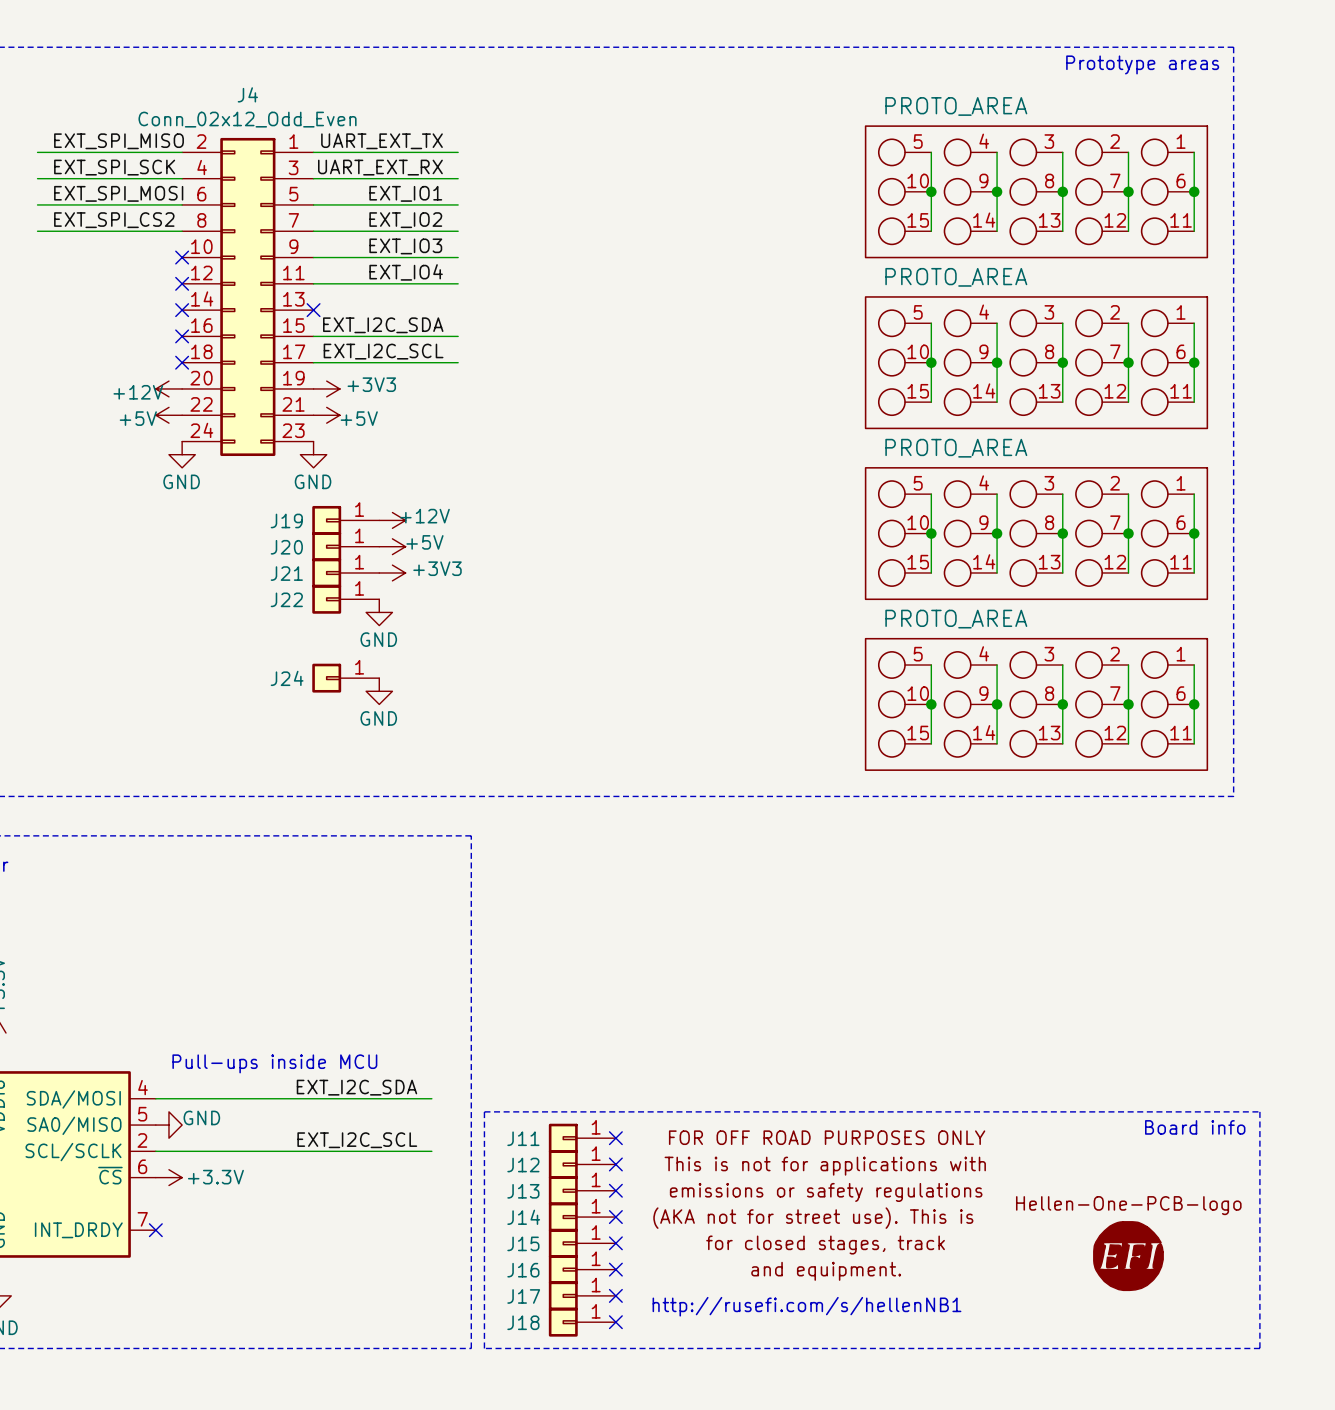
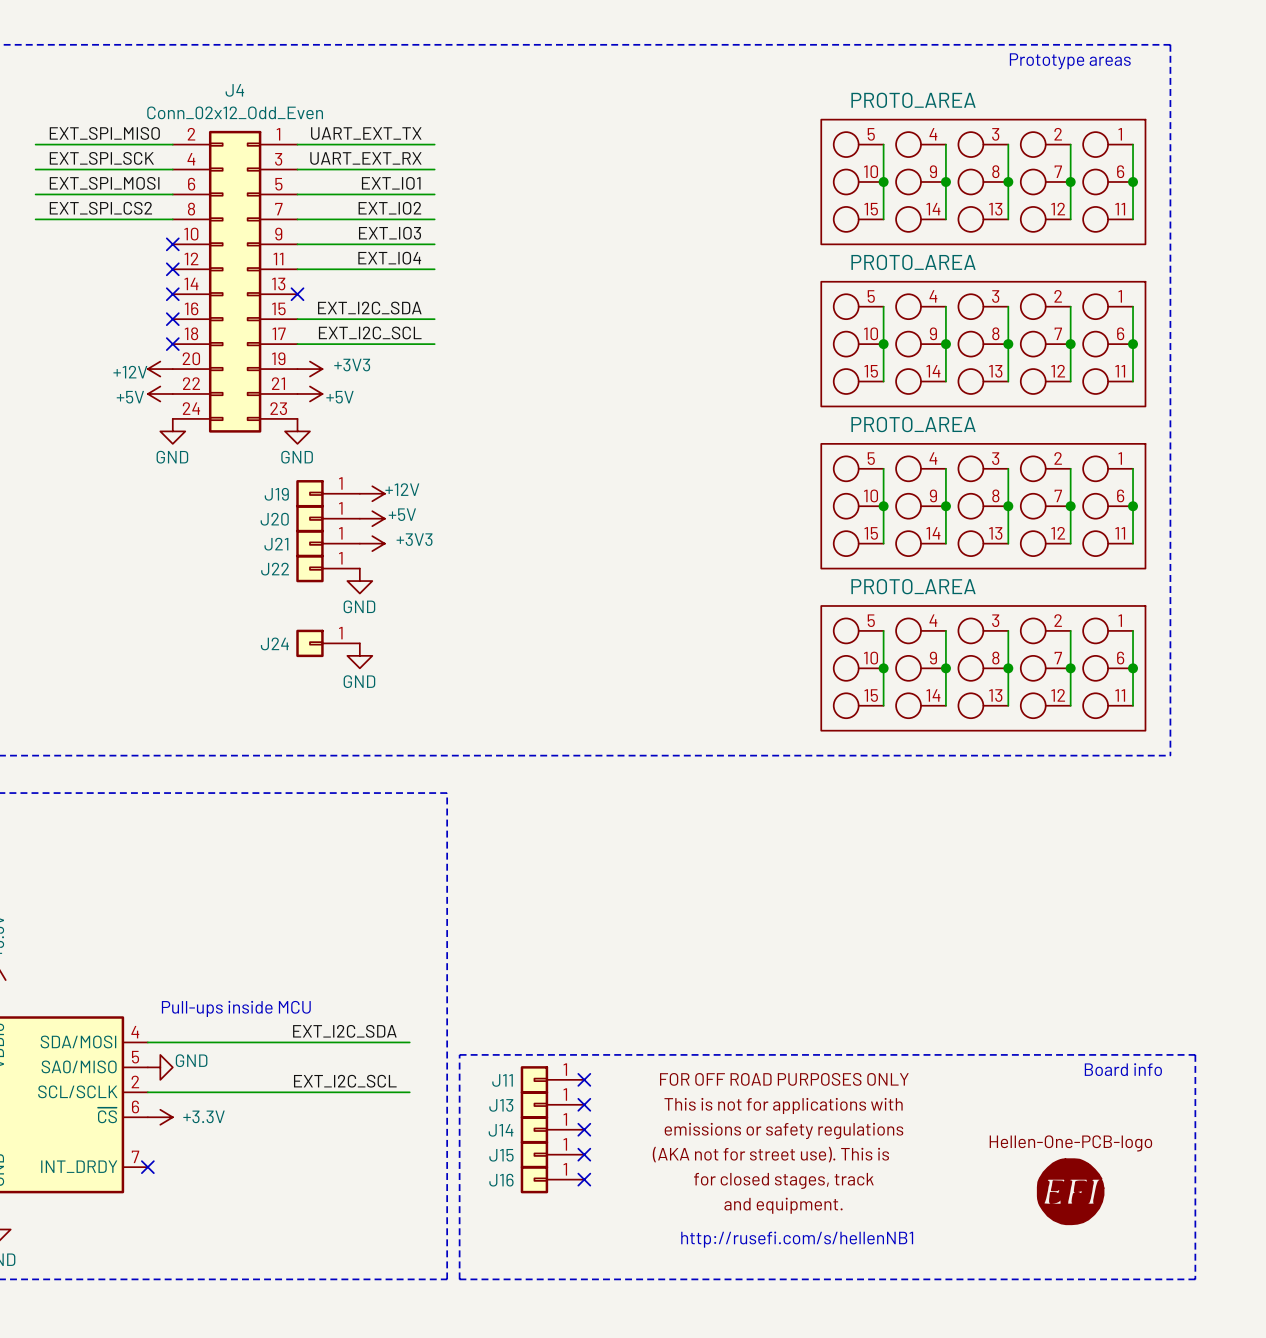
J12 name: J12 (523, 1165) -> J13 (501, 1105)
J13 name: J13 (523, 1191) -> J14 (501, 1130)
J14 name: J14 (523, 1217) -> J15 (501, 1155)
J15 name: J15 (523, 1243) -> J16 (501, 1180)
J16: (582, 1269) -> none
no-connect mark: (615, 1269) -> none
J17: (582, 1295) -> none
no-connect mark: (615, 1295) -> none
J18: (582, 1322) -> none
no-connect mark: (615, 1322) -> none

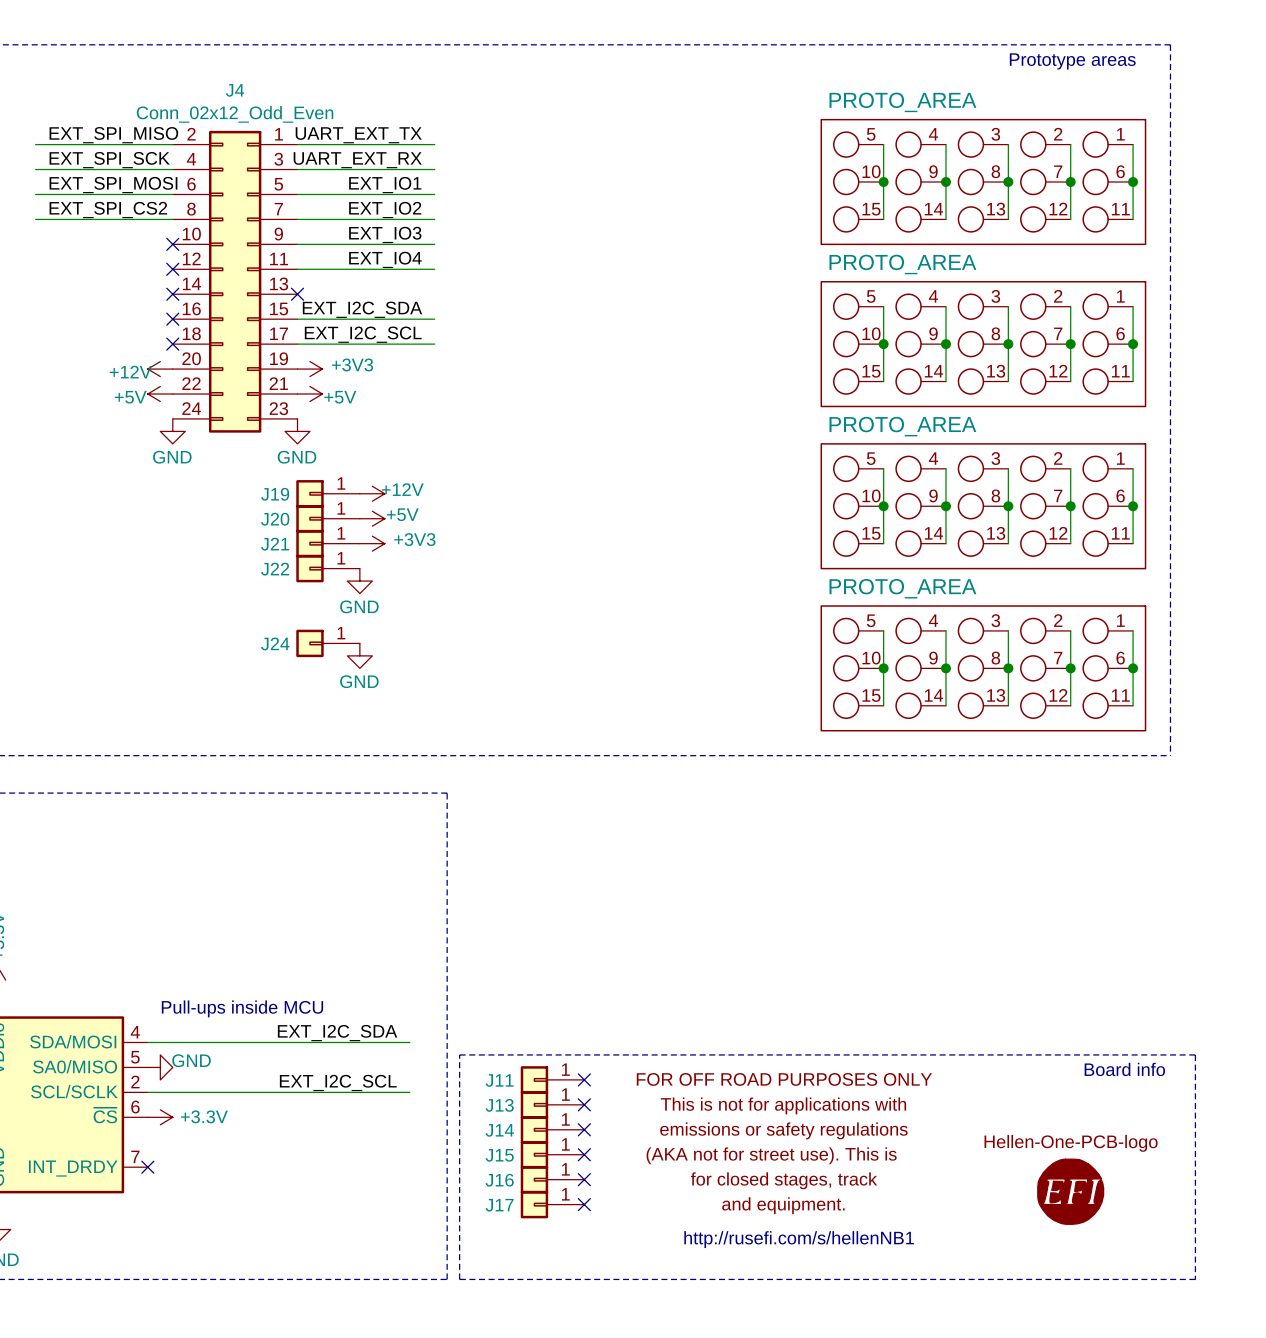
J17: none -> (552, 1204)
no-connect mark: none -> (584, 1204)

